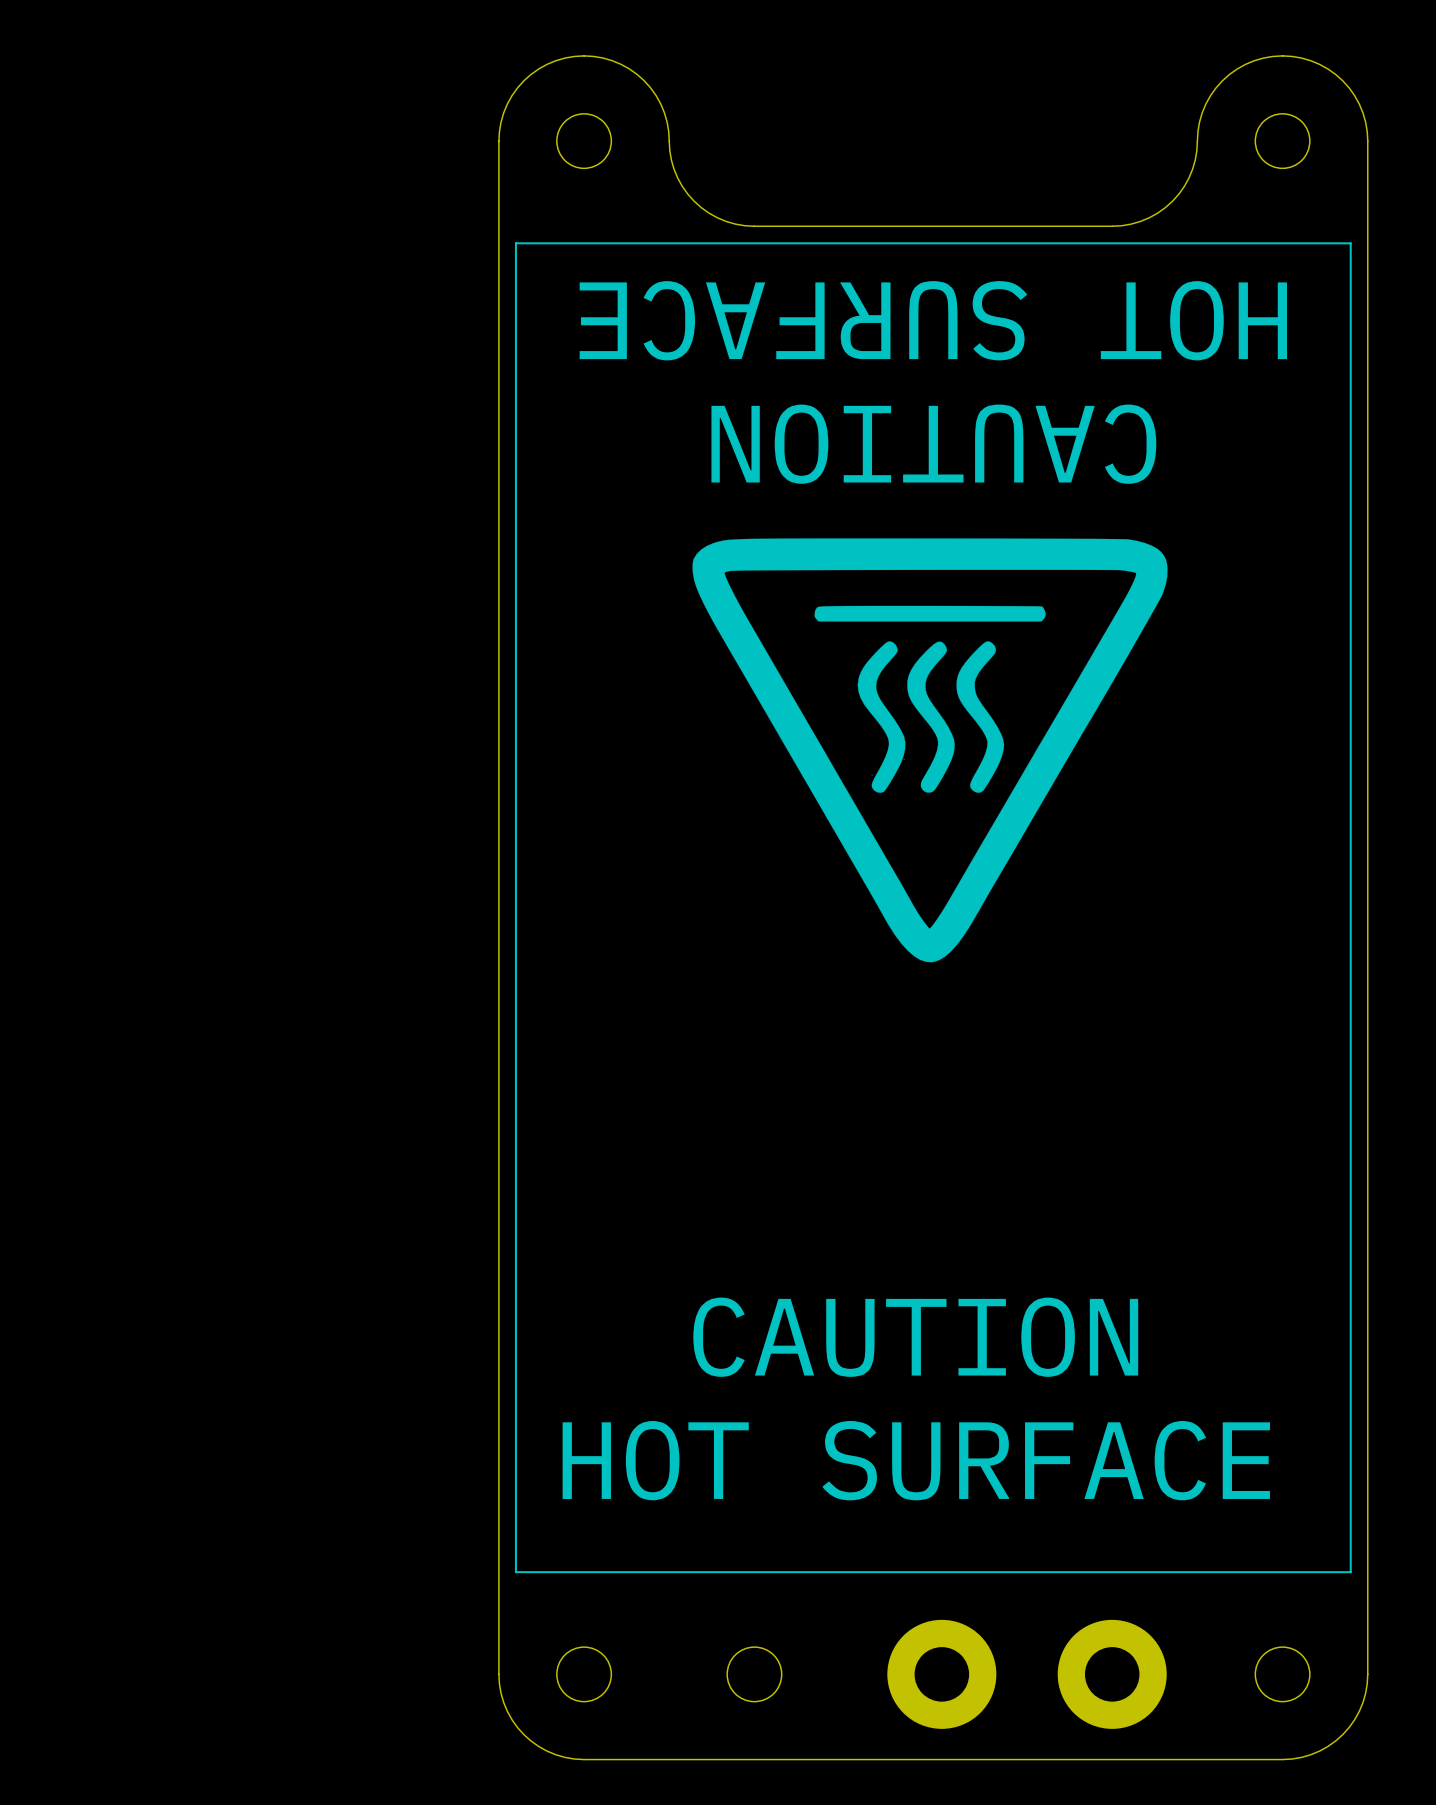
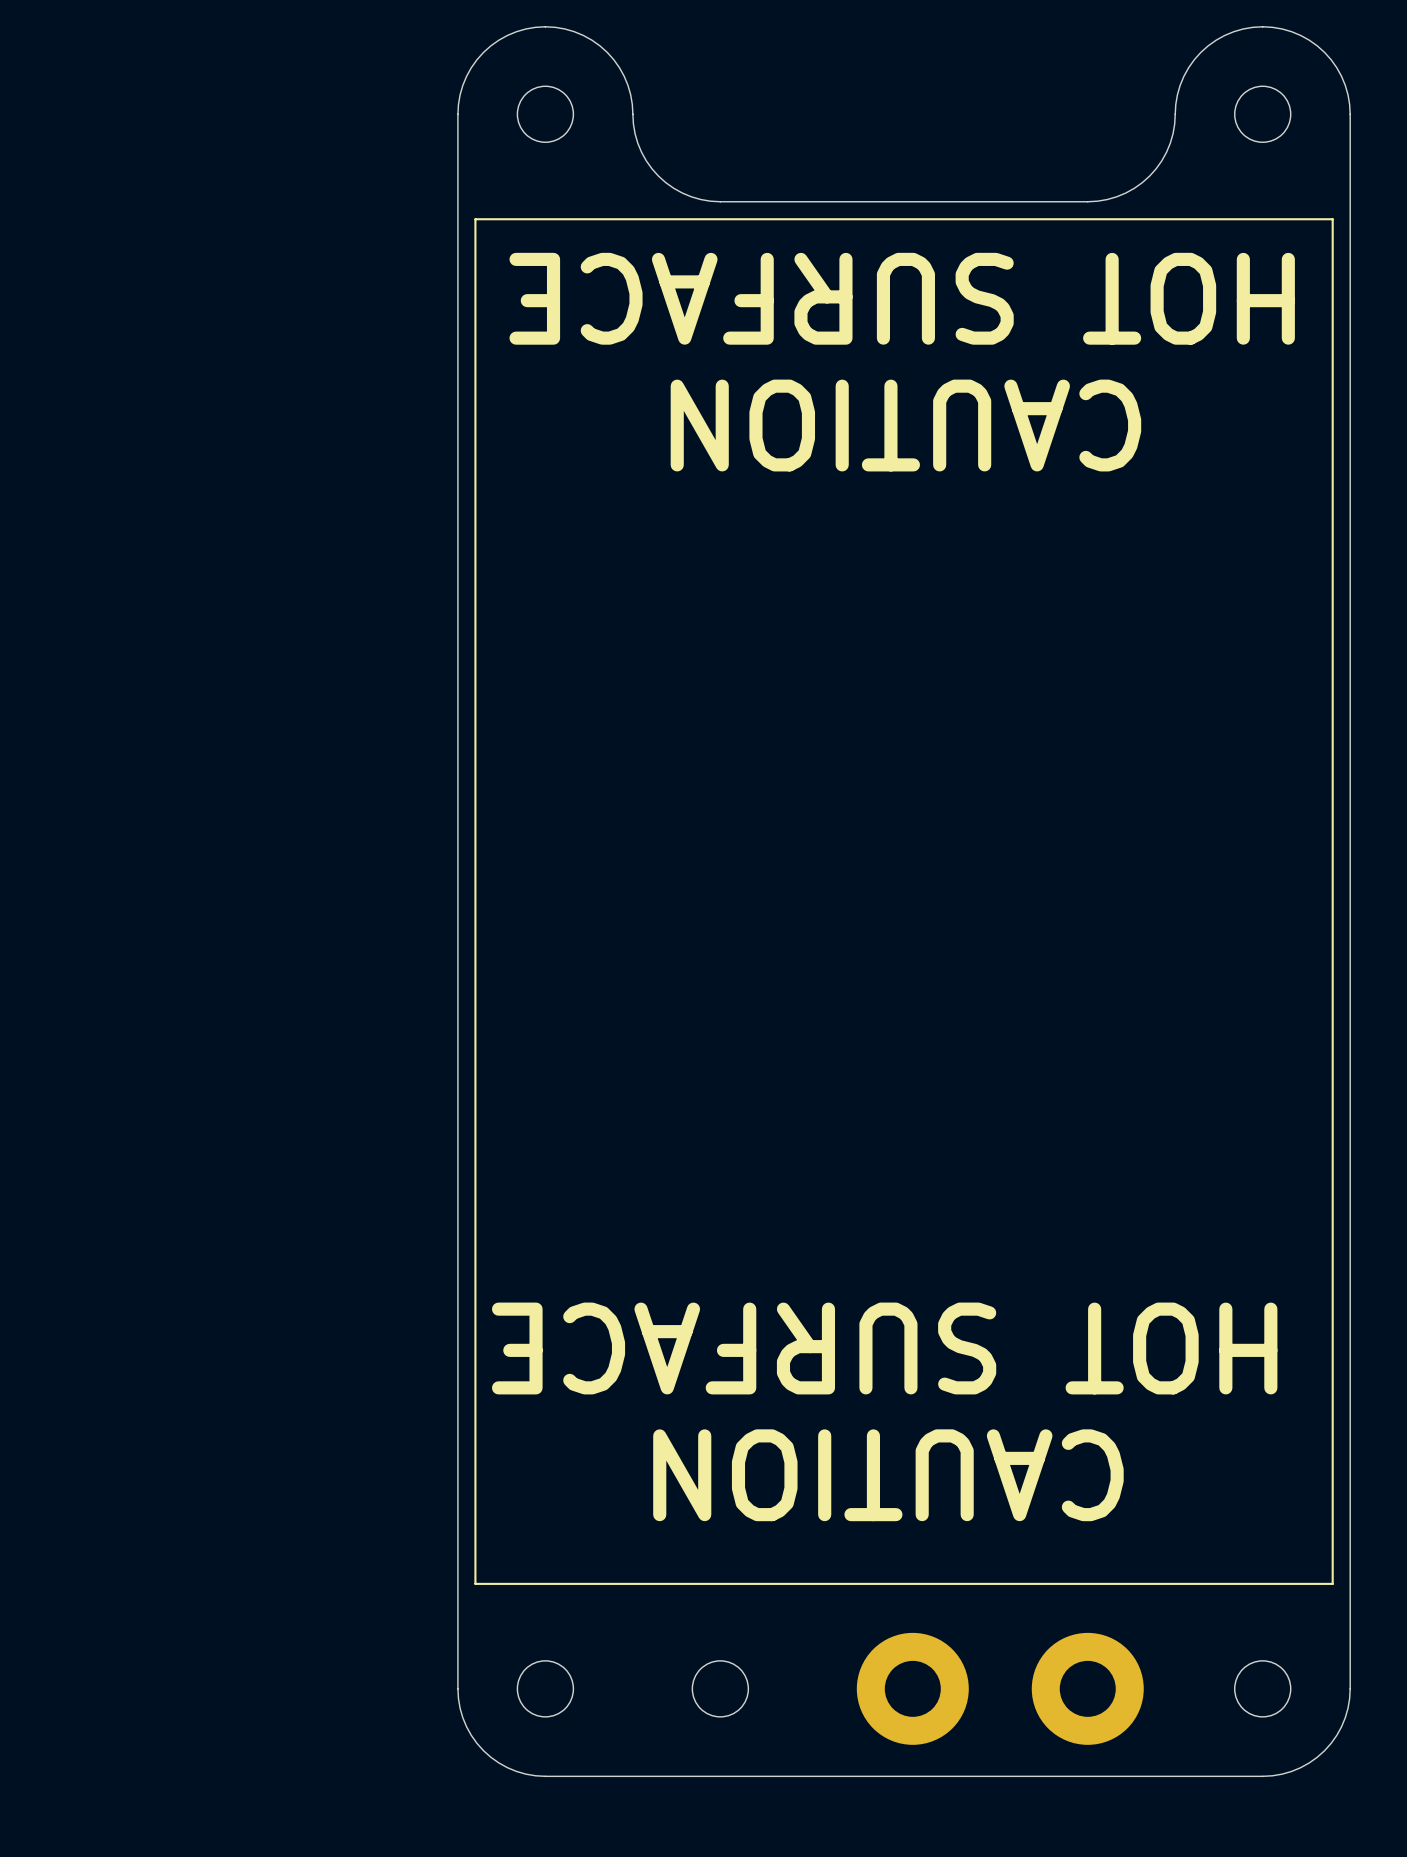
drawing: [692, 538, 1168, 963] -> none
text: CAUTION (915, 1337) -> HOT SURFACE (884, 1348)
text: HOT SURFACE (916, 1460) -> CAUTION (888, 1475)

